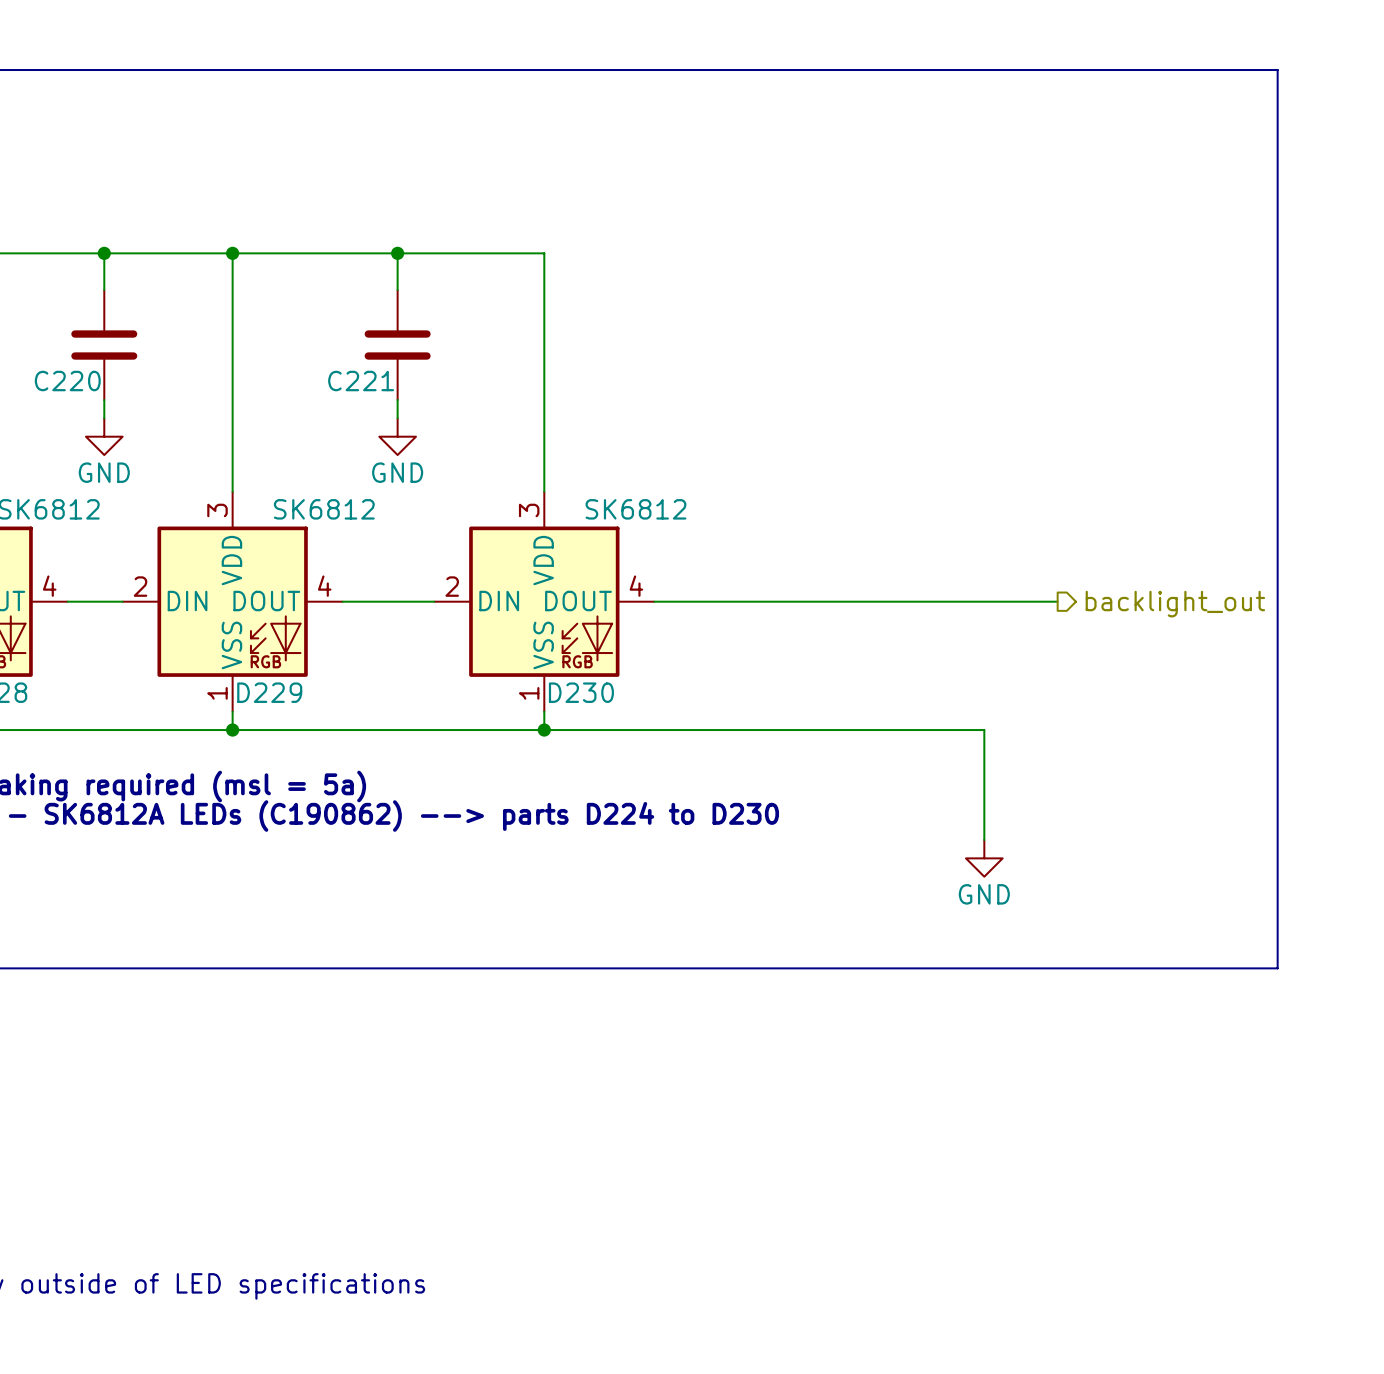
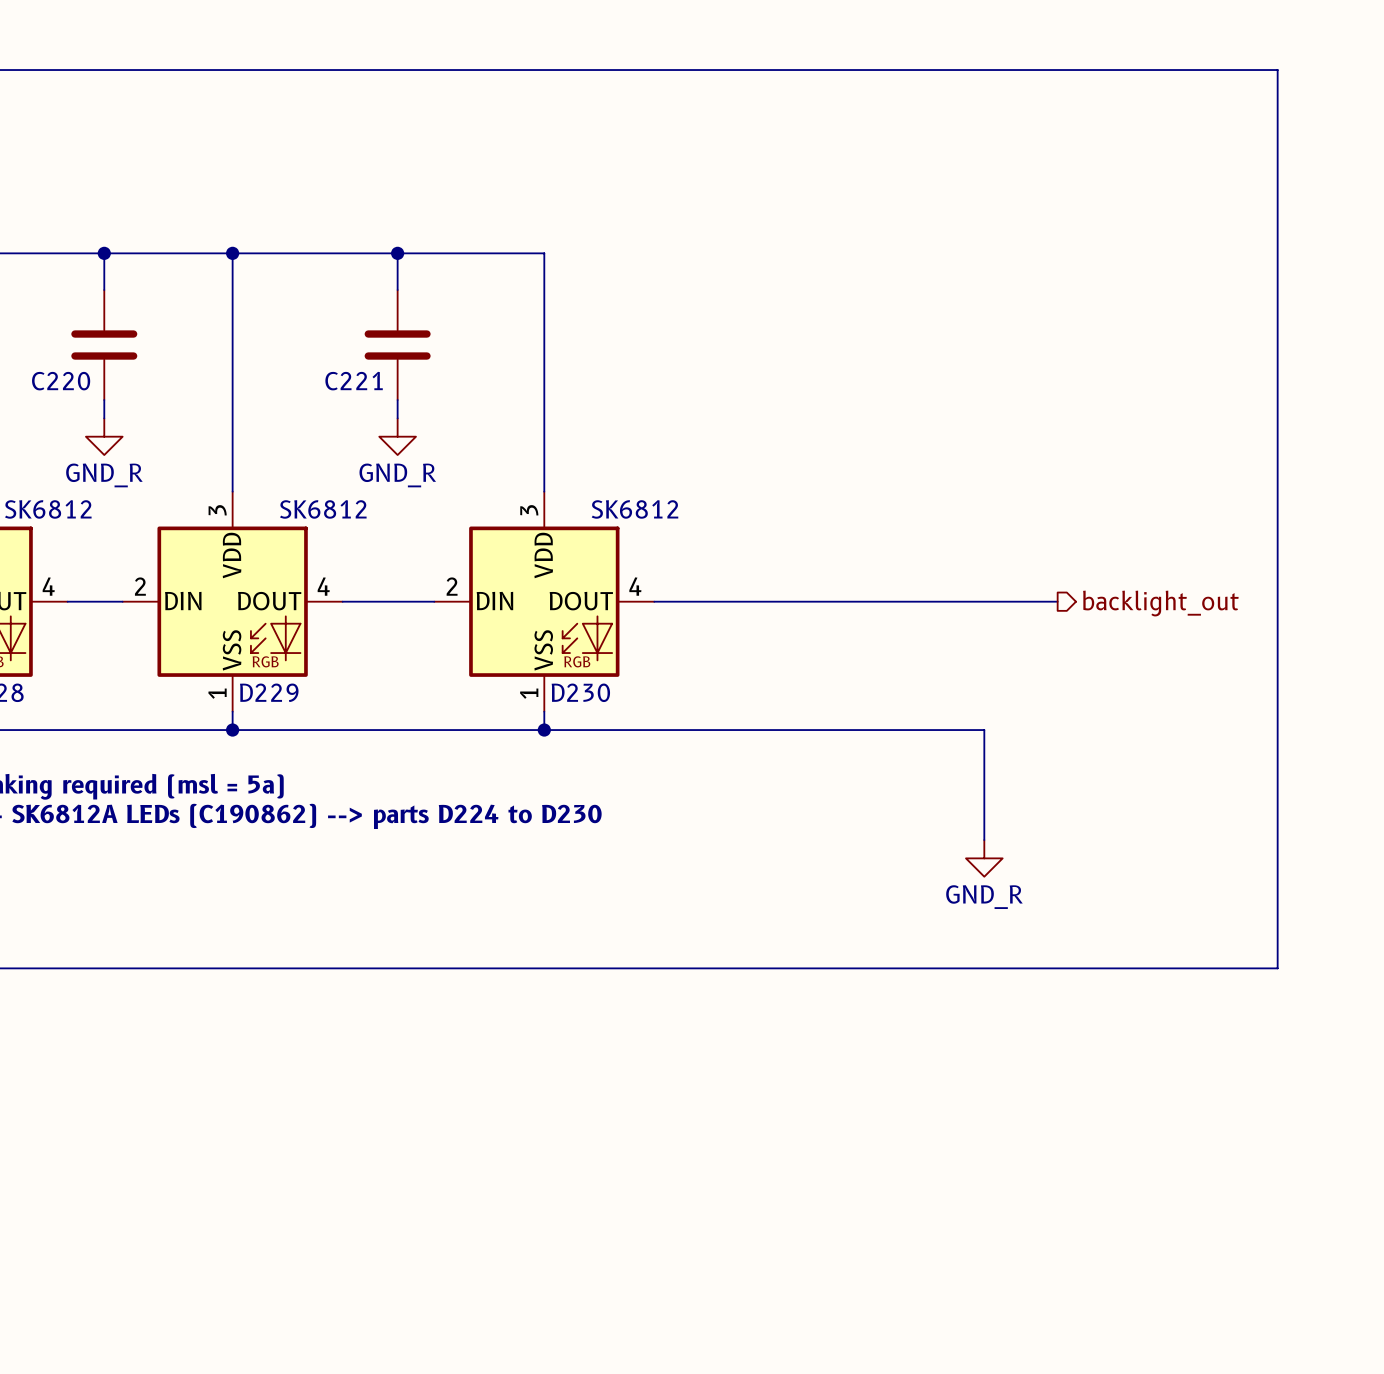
power symbol: GND (104, 436) -> GND_R (104, 436)
power symbol: GND (397, 436) -> GND_R (397, 436)
power symbol: GND (984, 858) -> GND_R (984, 858)

